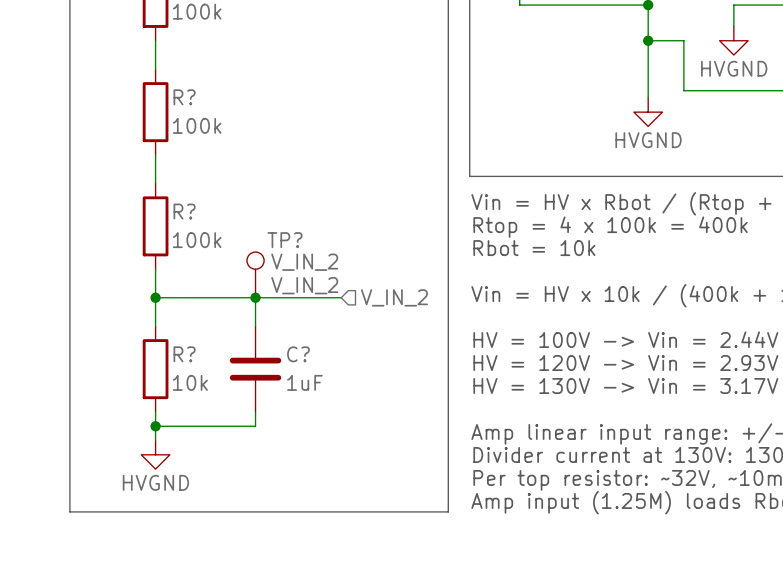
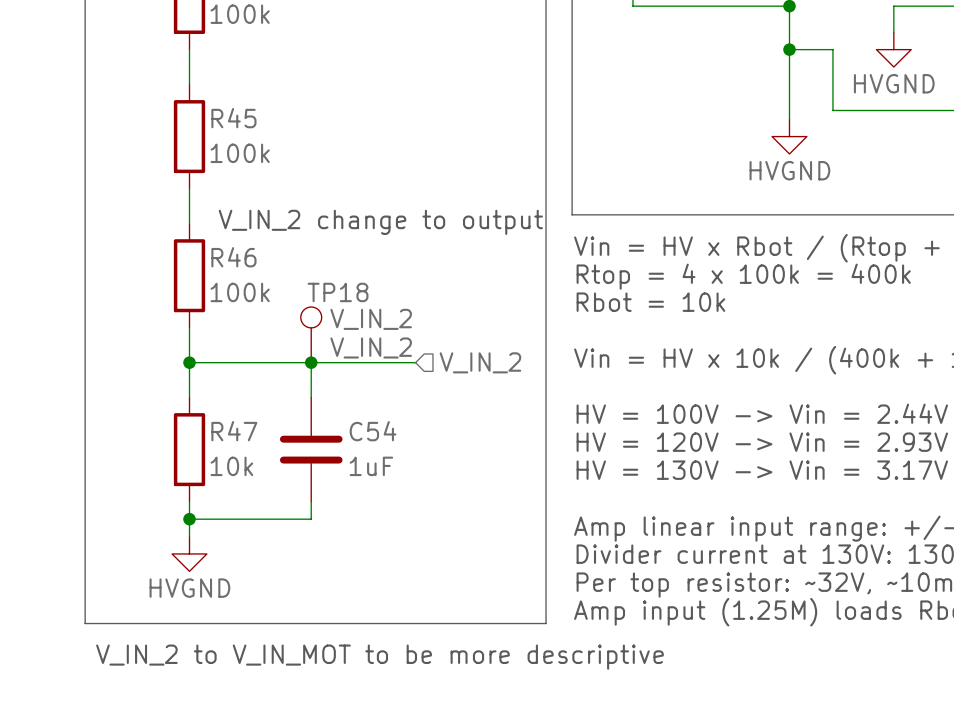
R? name: R? (184, 97) -> R45 (233, 118)
text: none -> V_IN_2 change to output (380, 222)
R? name: R? (184, 211) -> R46 (233, 257)
TP? name: TP? (285, 240) -> TP18 (338, 292)
R? name: R? (184, 354) -> R47 (234, 431)
C? name: C? (298, 354) -> C54 (373, 431)
text: none -> V_IN_2 to V_IN_MOT to be more descriptive (379, 657)

